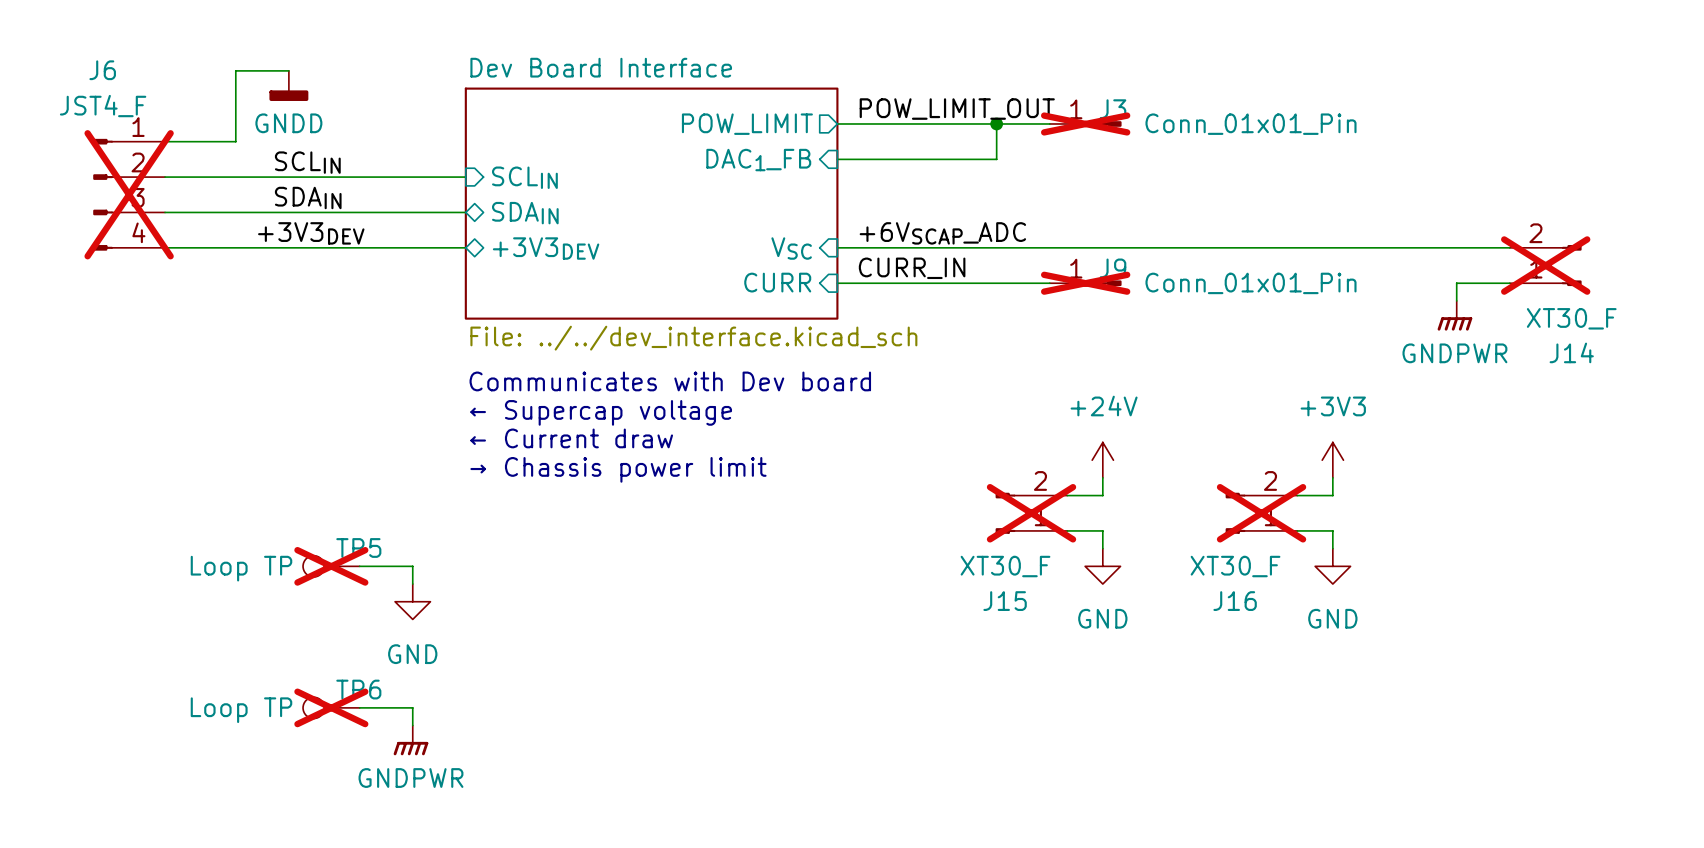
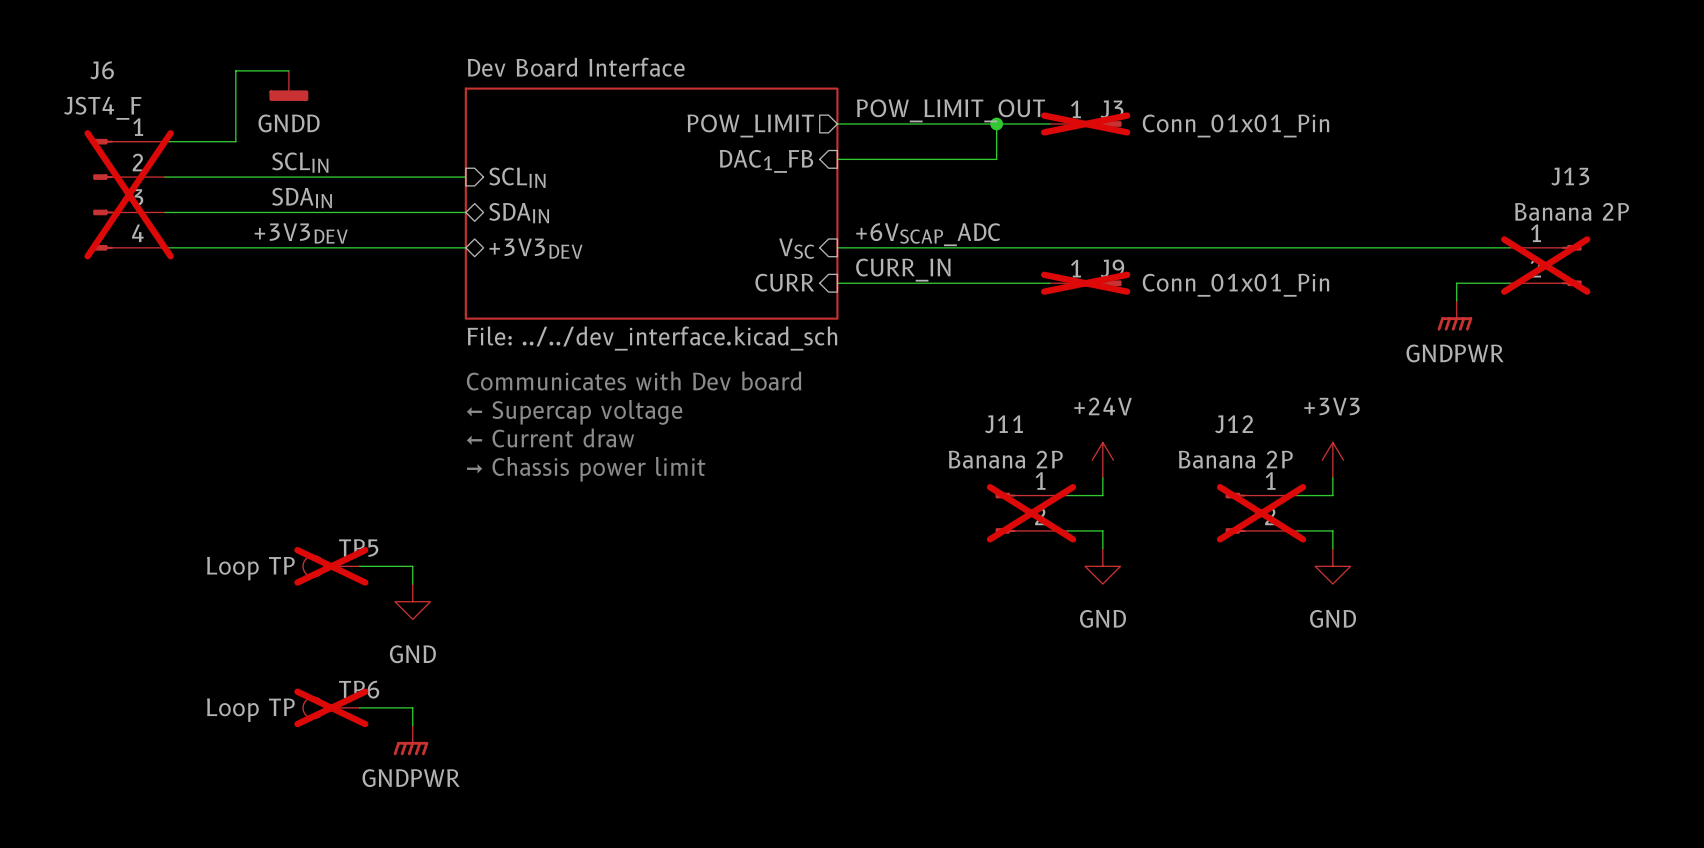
J14 flip: as is (1571, 265) -> up-down (1571, 265)
J14 value: XT30_F (1571, 318) -> Banana 2P (1572, 211)
J14 name: J14 (1571, 352) -> J13 (1570, 176)
J15 flip: as is (1005, 513) -> up-down (1005, 513)
J16 flip: as is (1235, 513) -> up-down (1235, 513)
J15 value: XT30_F (1005, 566) -> Banana 2P (1005, 459)
J16 value: XT30_F (1235, 566) -> Banana 2P (1235, 459)
J15 name: J15 (1005, 601) -> J11 (1004, 424)
J16 name: J16 (1235, 601) -> J12 (1234, 424)

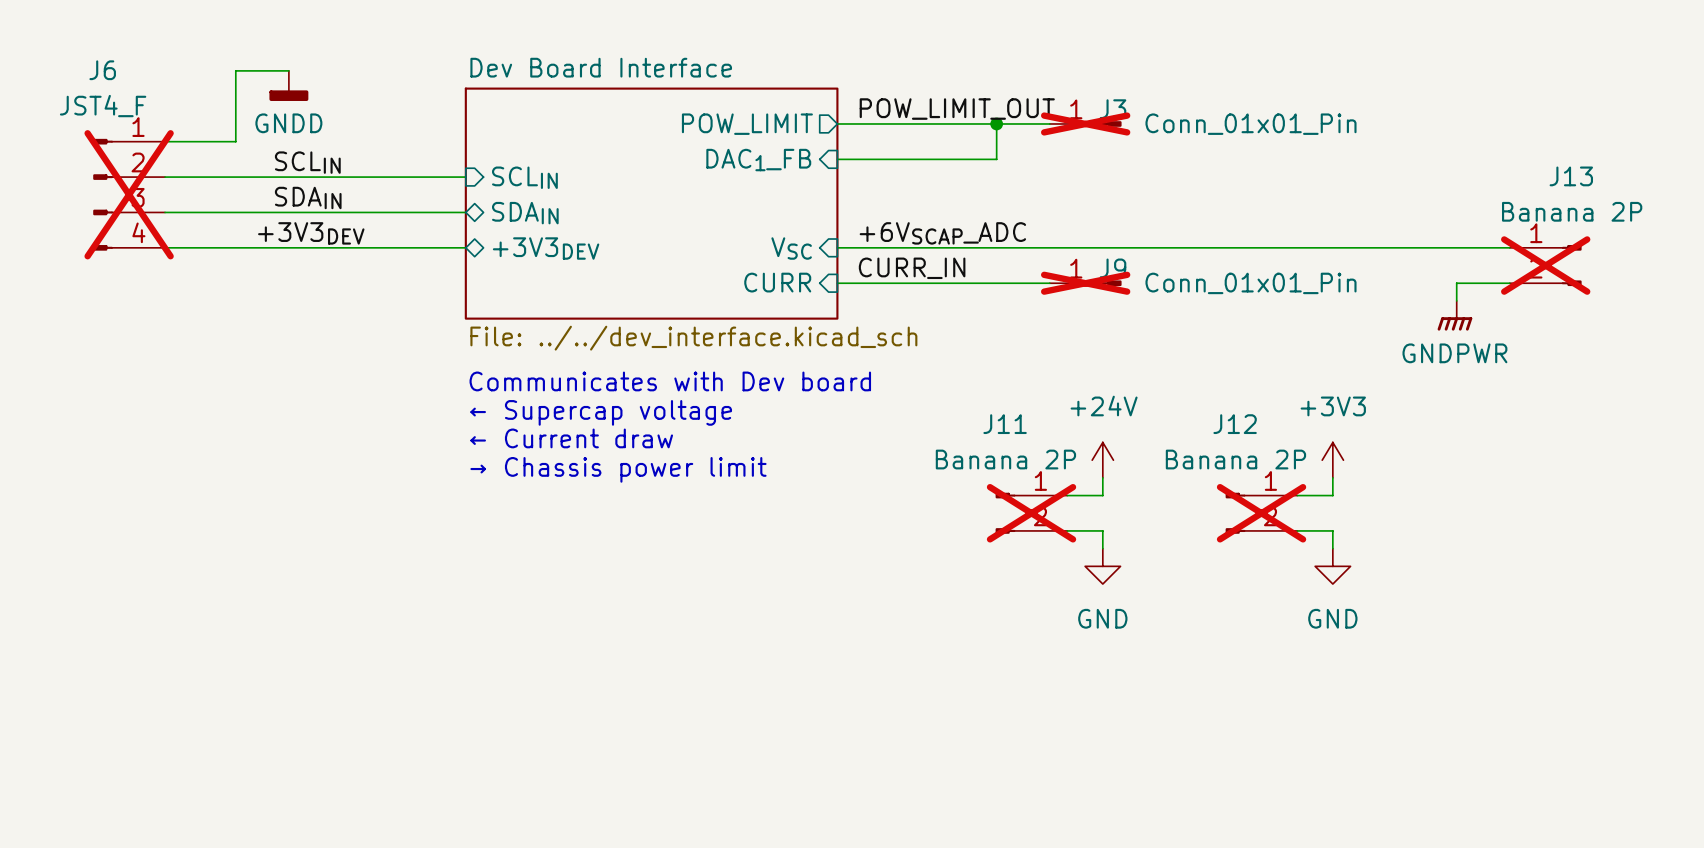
TP5: Loop TP (331, 566) -> none
wire: (359, 566) (412, 566) (412, 584) -> none
power symbol: GND (412, 601) -> none
TP6: Loop TP (331, 707) -> none
wire: (359, 707) (412, 707) (412, 725) -> none
power symbol: GNDPWR (410, 740) -> none

